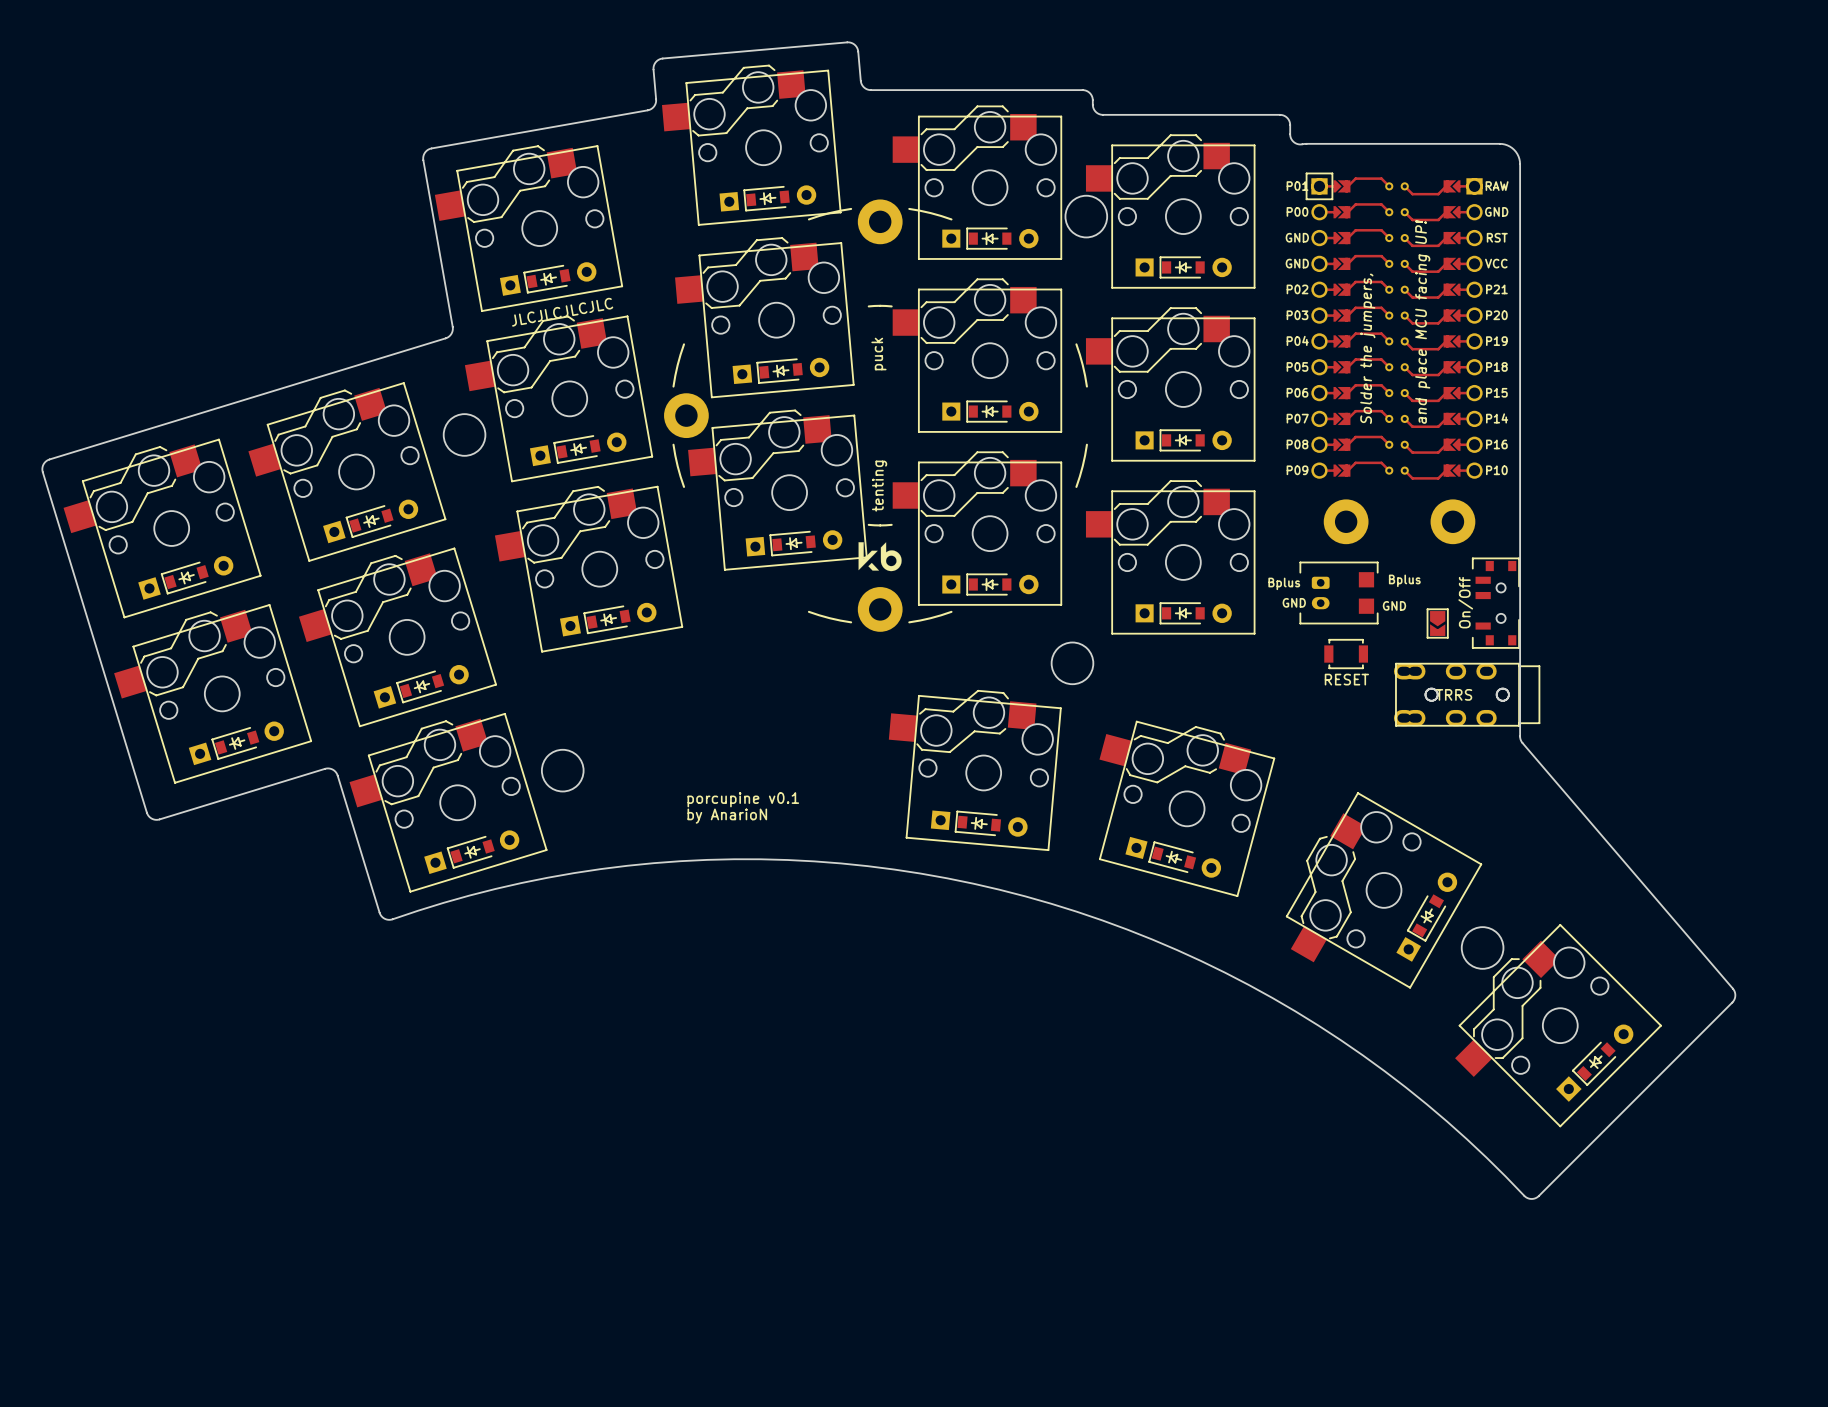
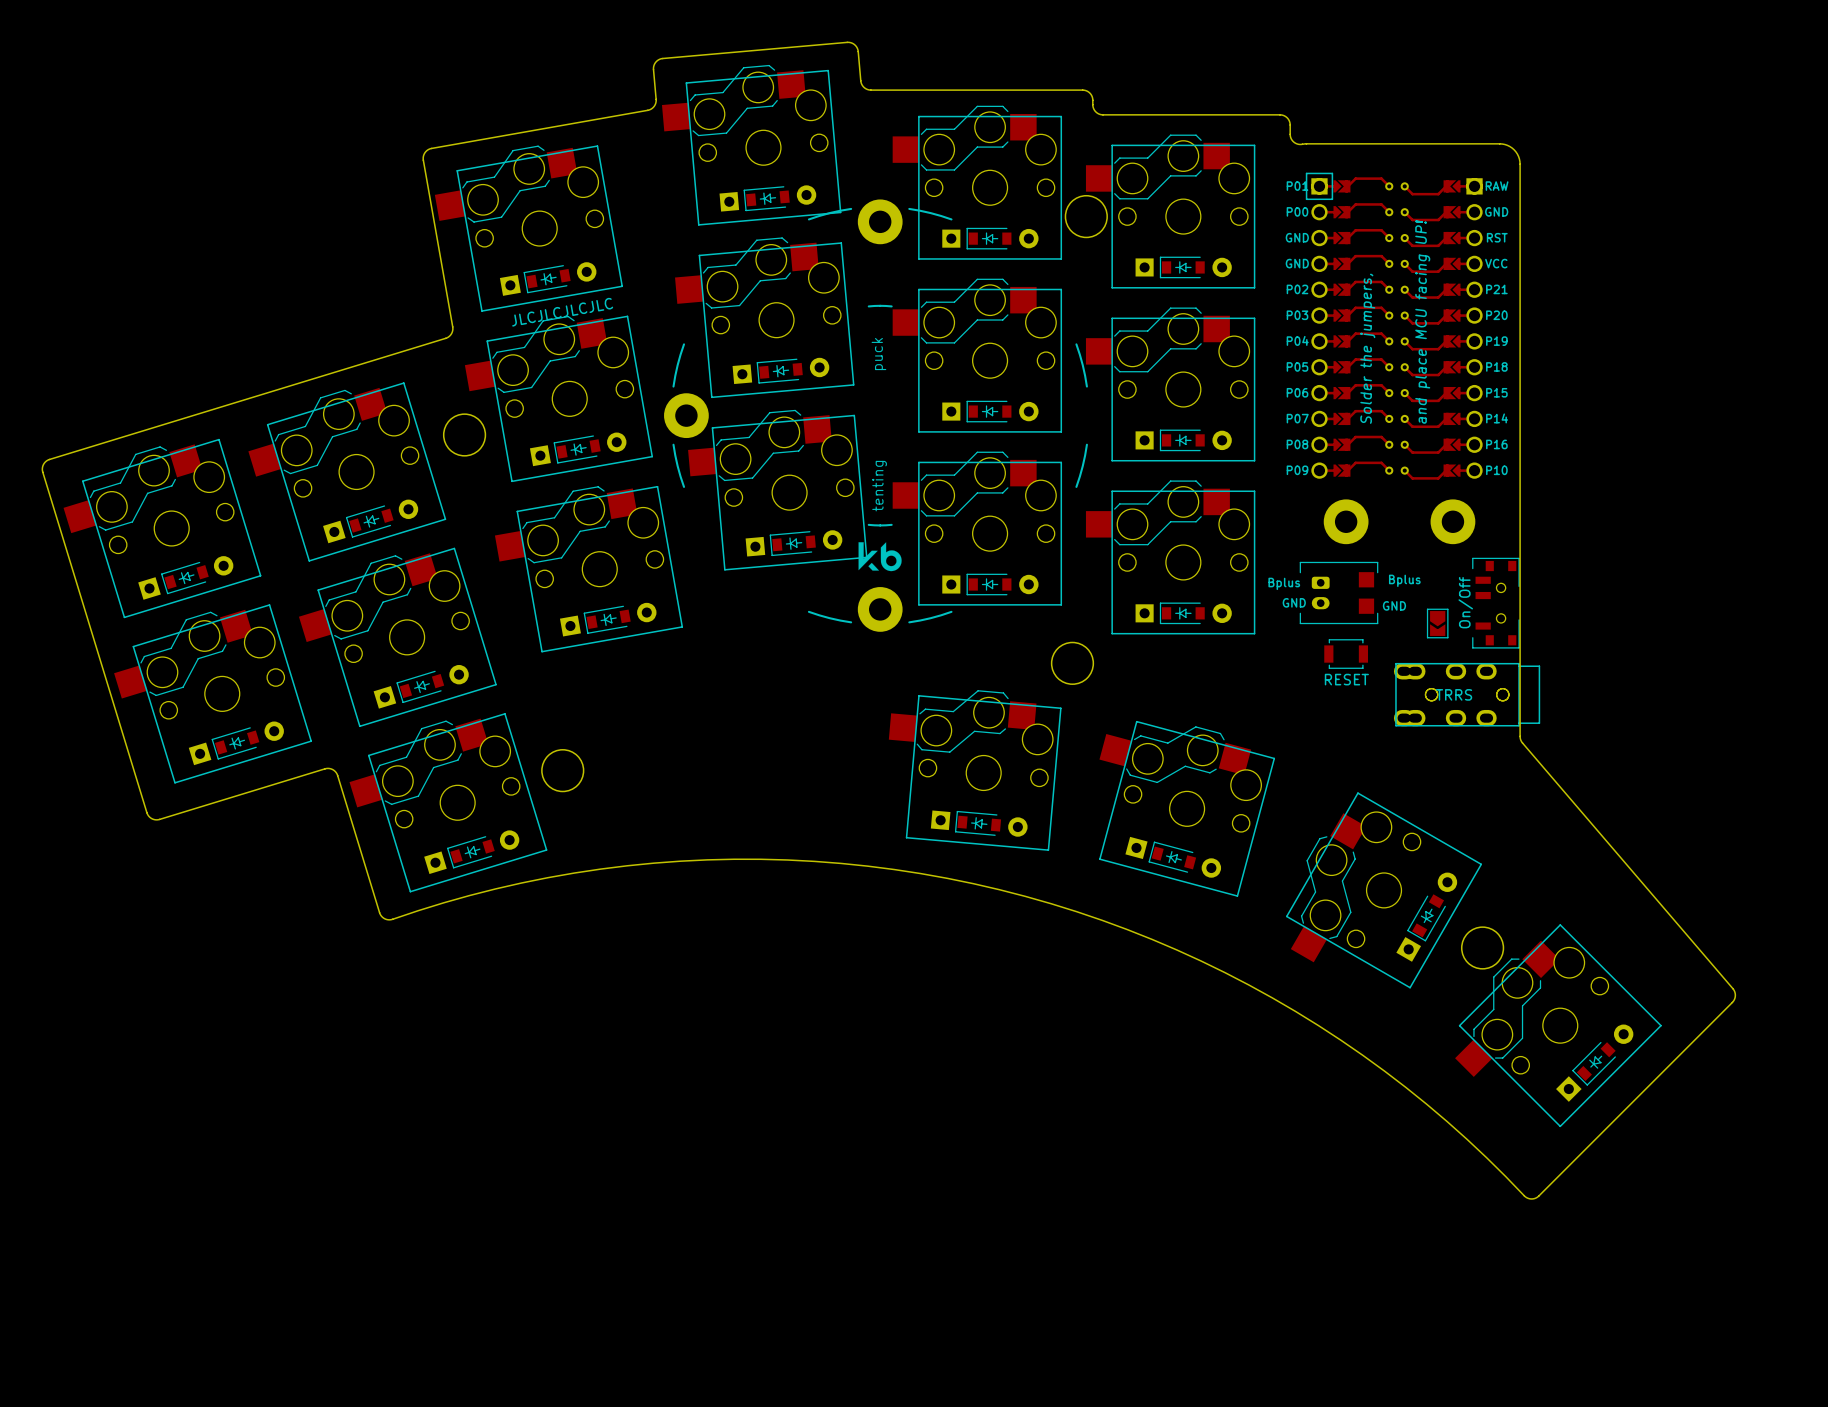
text: porcupine v0.1 (743, 799) -> none
text: by AnarioN (727, 816) -> none

